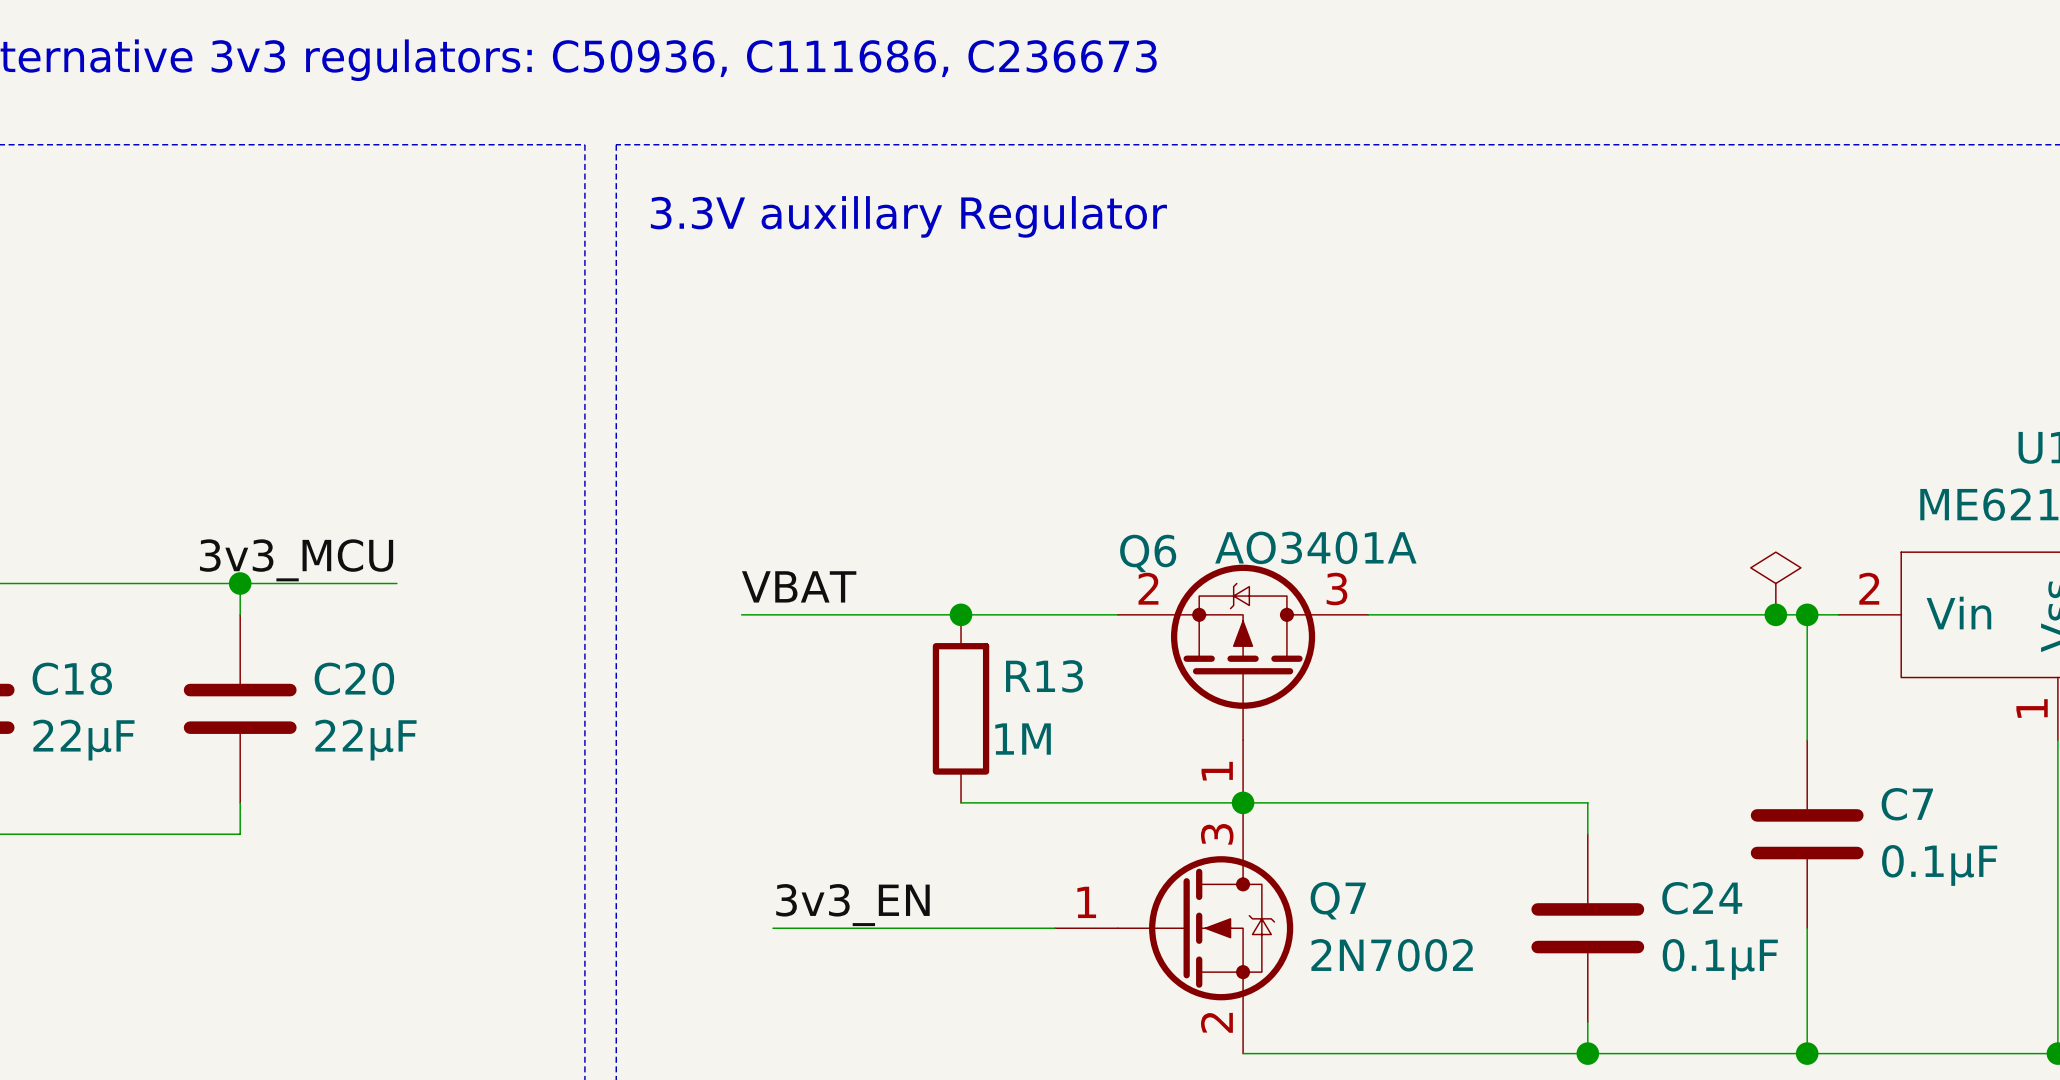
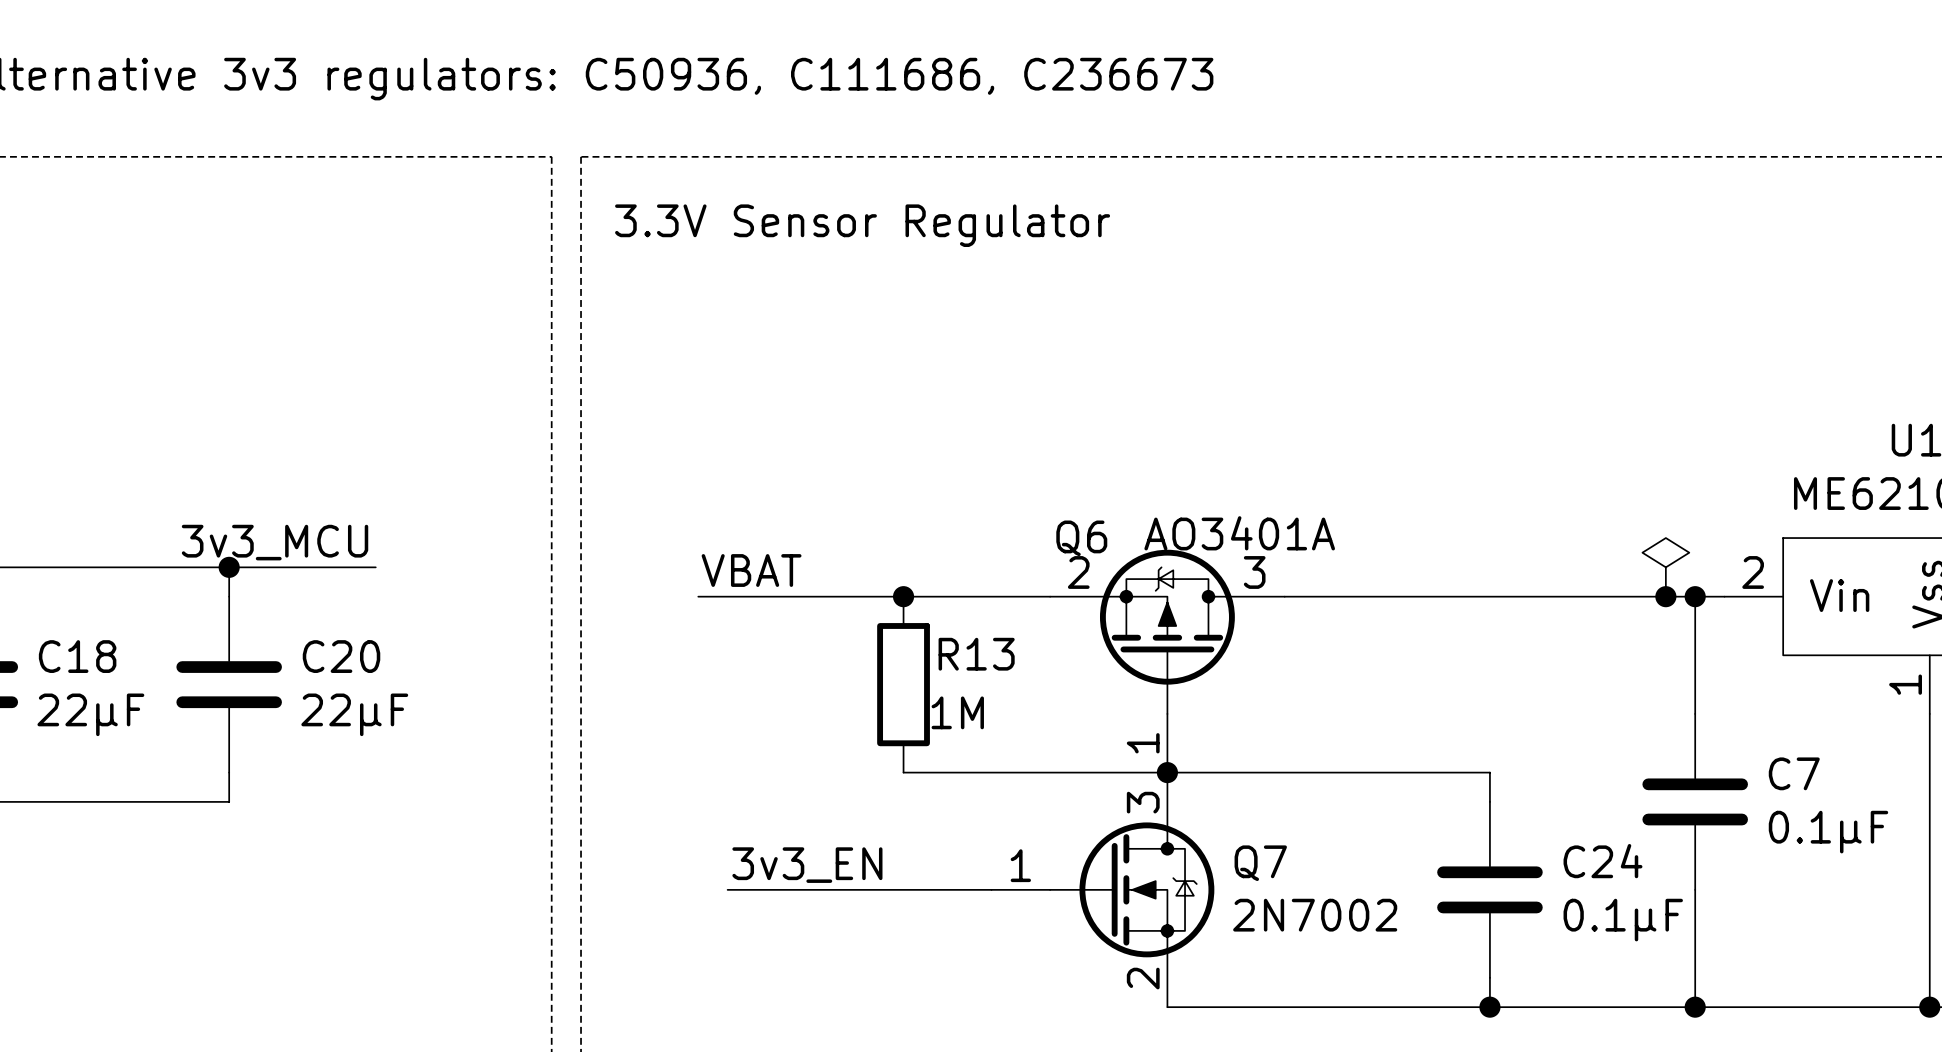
text: 3.3V auxillary Regulator (908, 216) -> 3.3V Sensor Regulator (862, 225)

